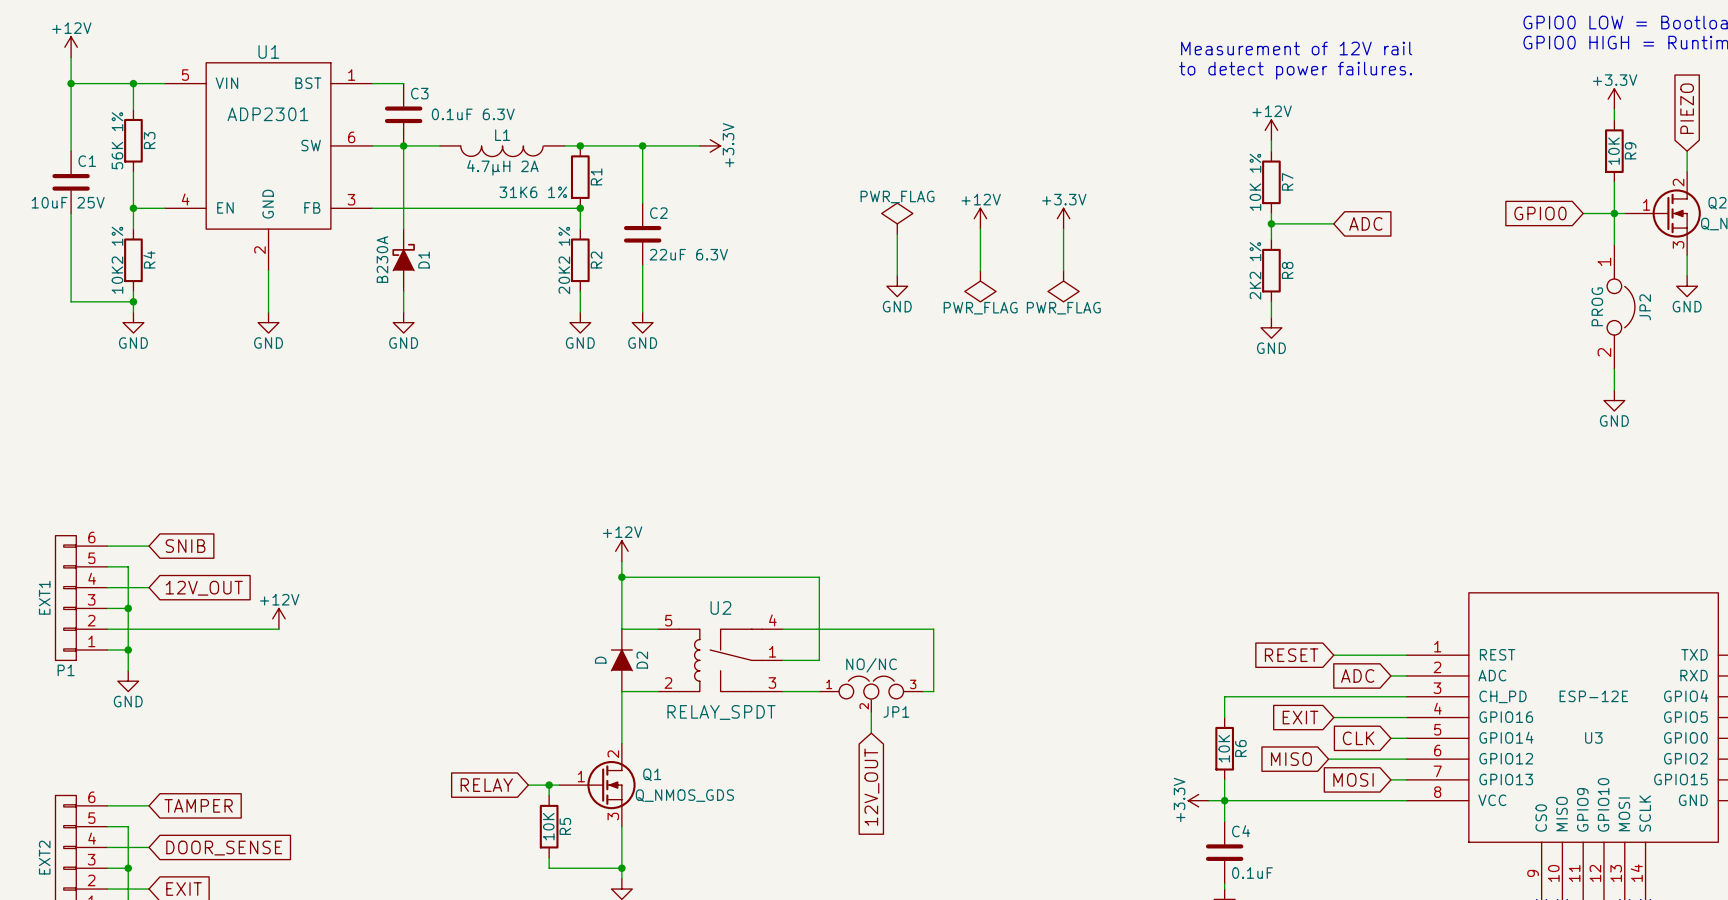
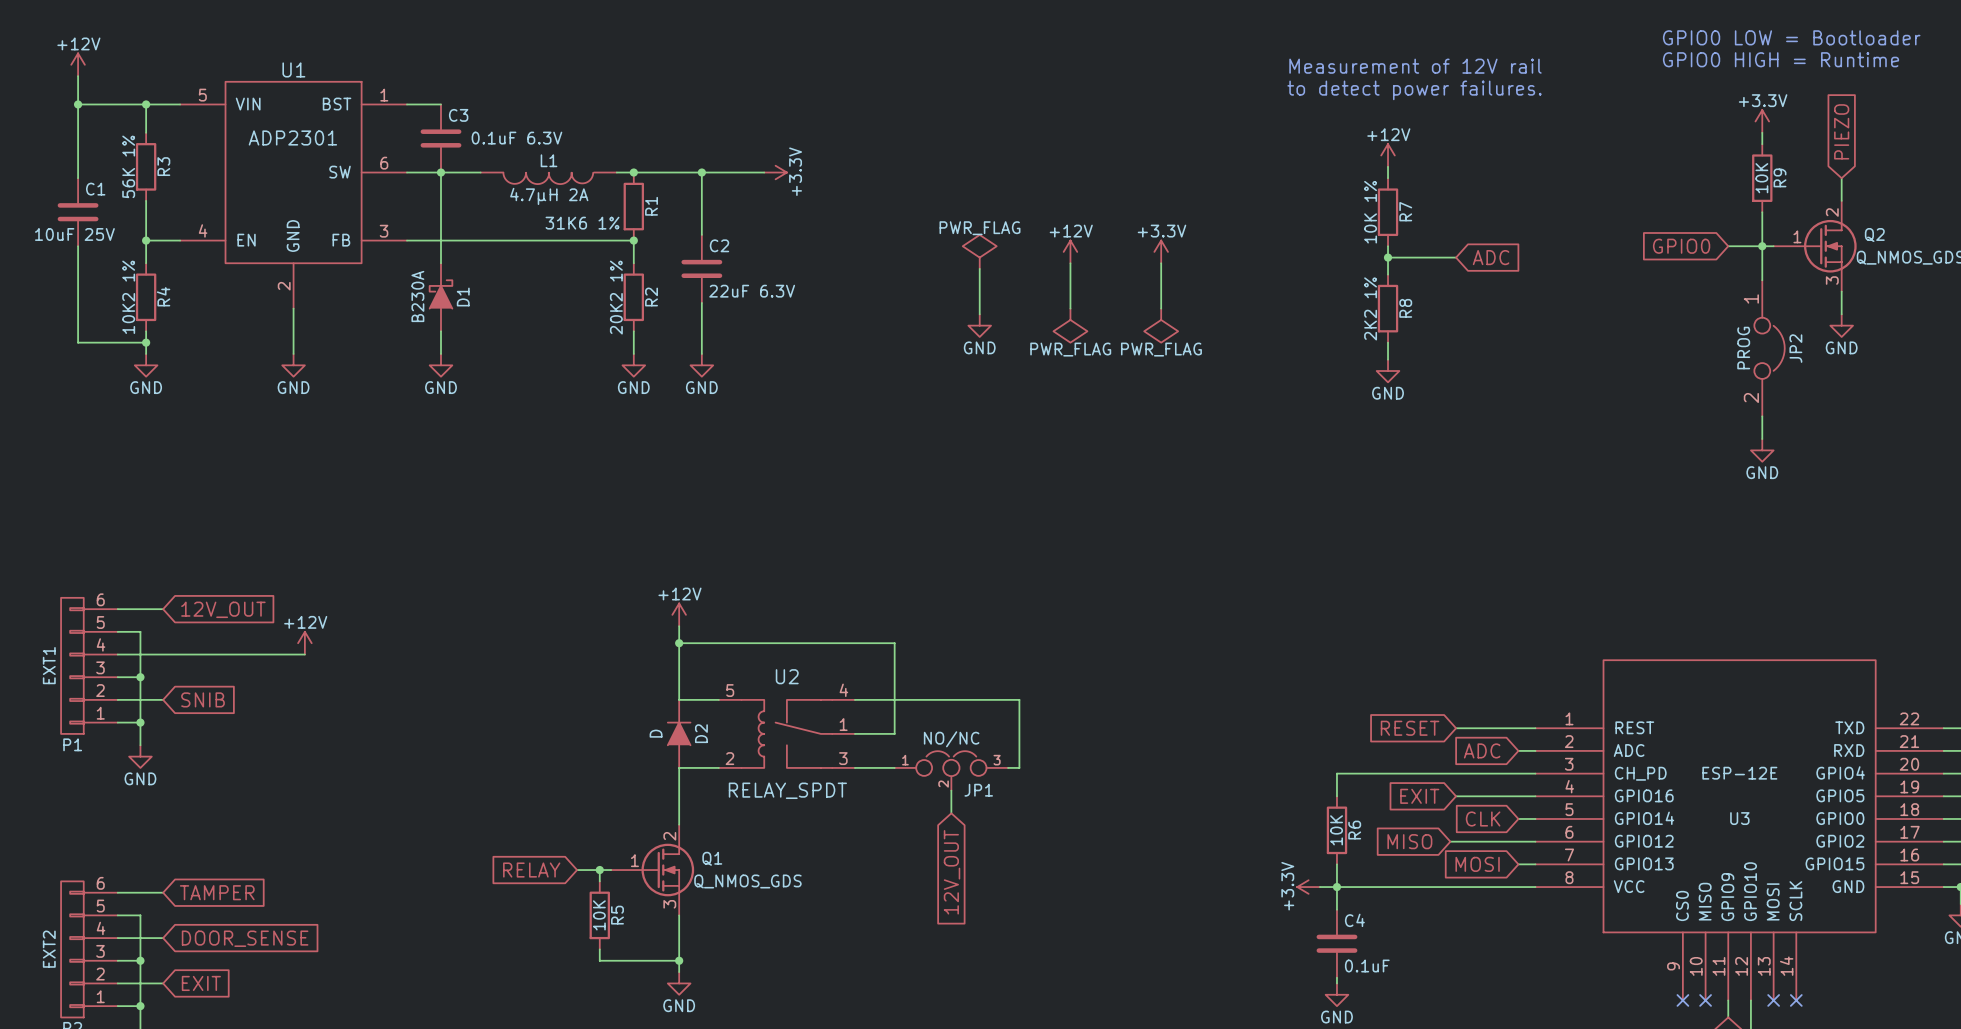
global label: SNIB (185, 546) -> 12V_OUT (223, 609)
global label: 12V_OUT (204, 588) -> none
power symbol position: +12V (278, 618) -> +12V (304, 643)
wire: (149, 629) (278, 629) -> (163, 654) (304, 654)
global label: none -> SNIB (202, 699)

